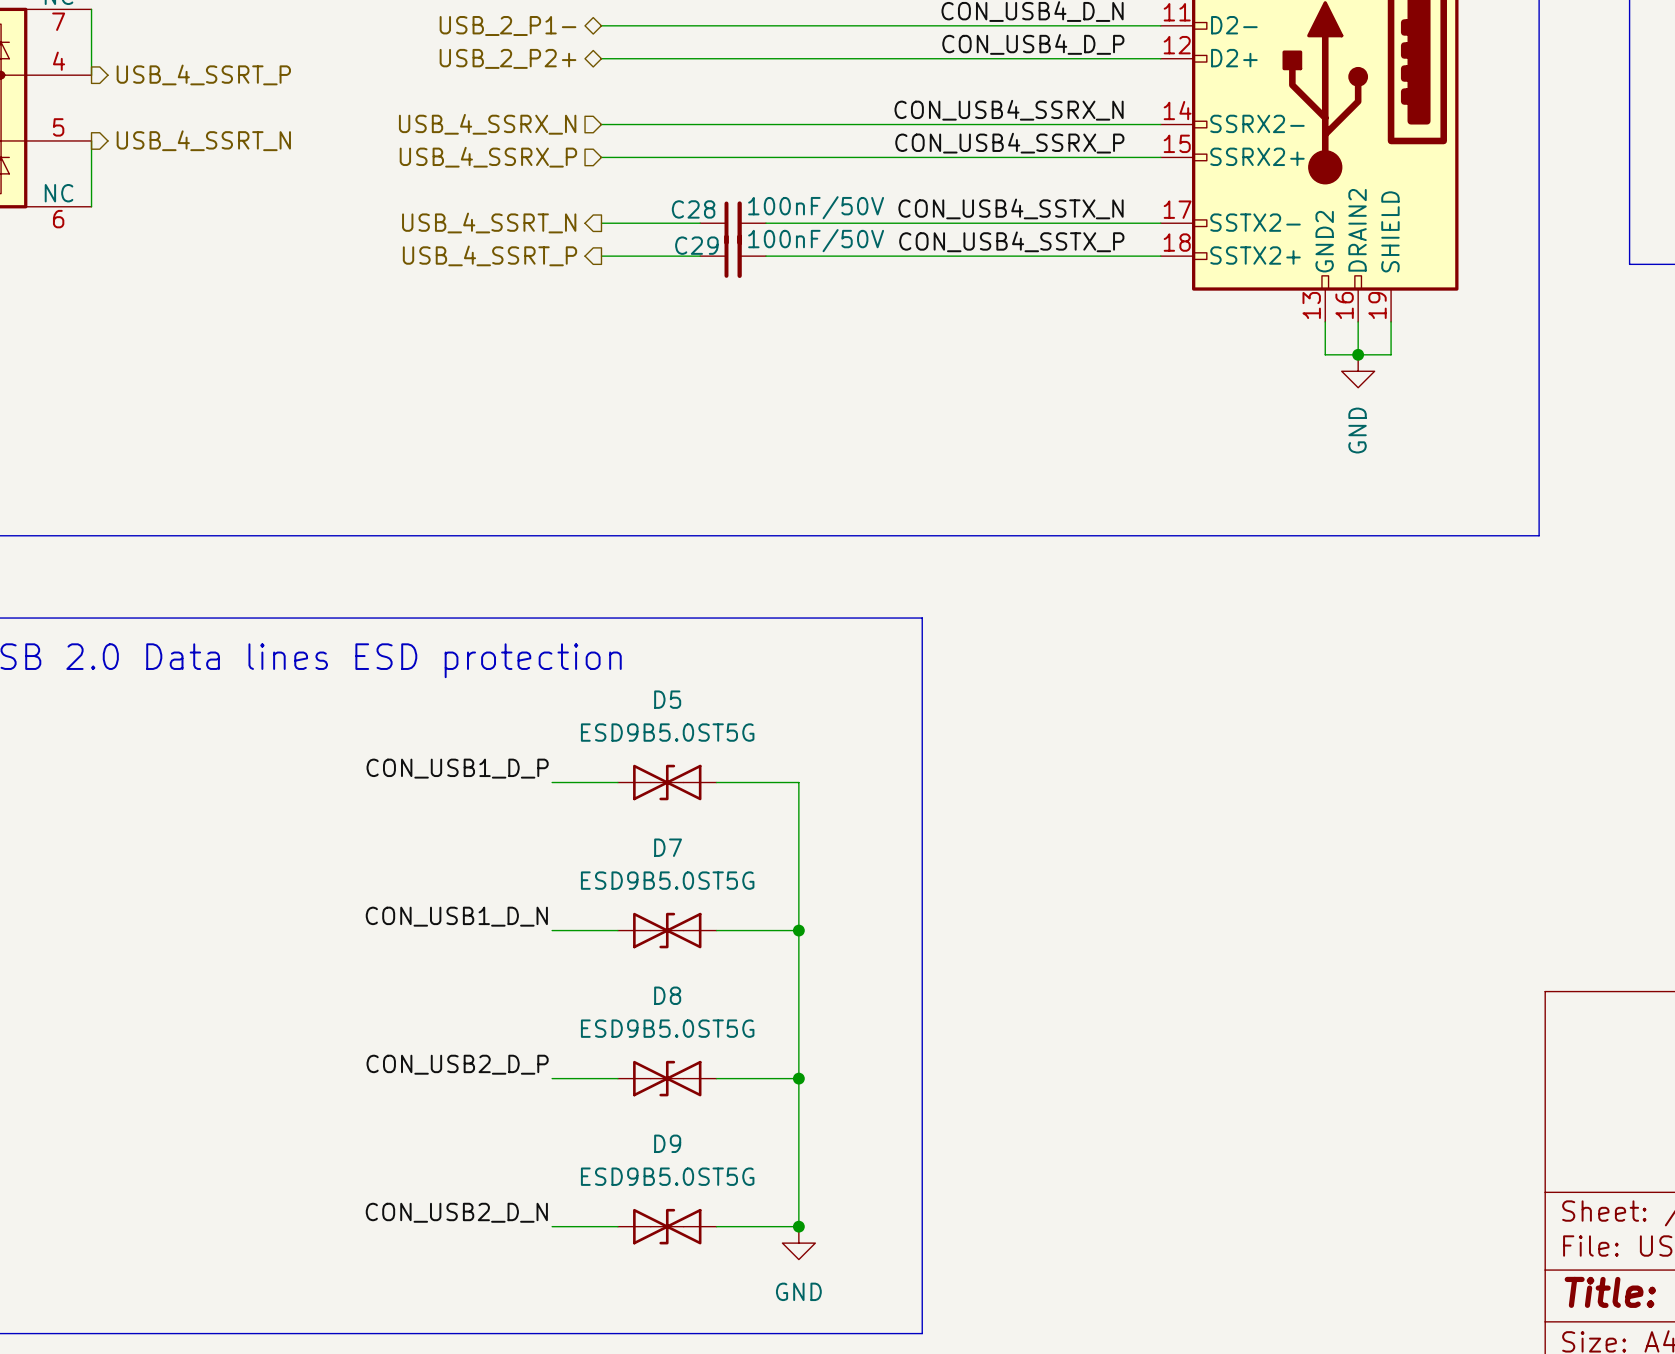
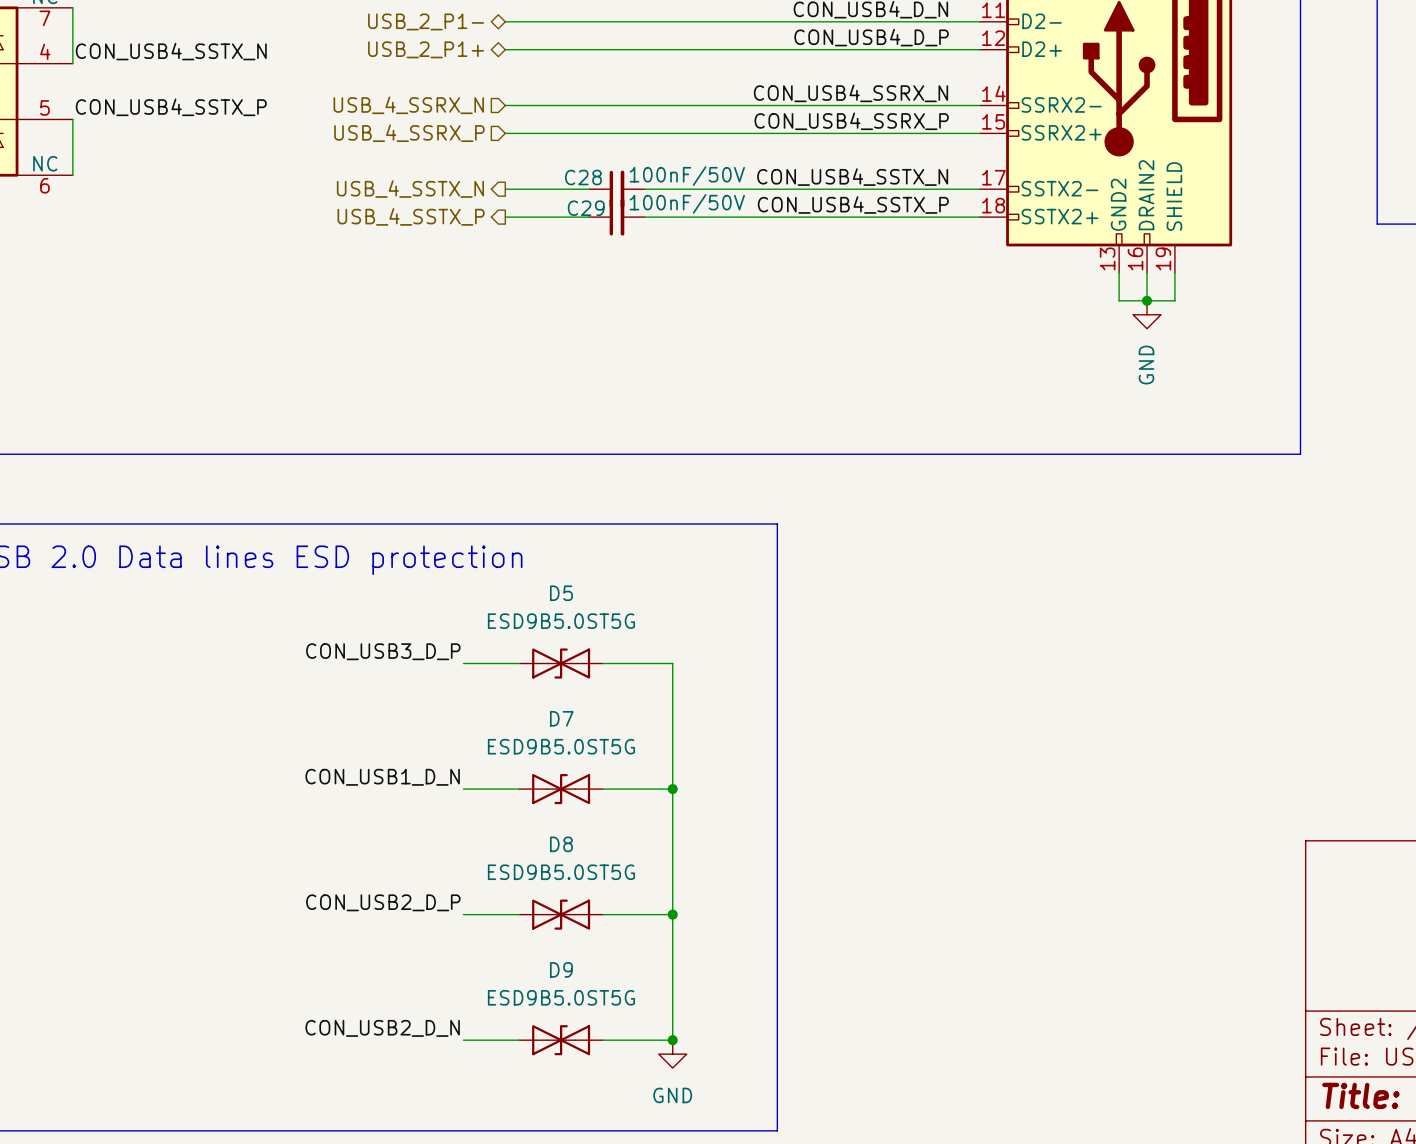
hierarchical label: USB_2_P2+ (508, 58) -> USB_2_P1+ (426, 49)
label: none -> CON_USB4_SSTX_N (171, 51)
hierarchical label: USB_4_SSRT_P (203, 74) -> none
label: none -> CON_USB4_SSTX_P (171, 107)
hierarchical label: USB_4_SSRT_N (203, 140) -> none
hierarchical label: USB_4_SSRT_N (489, 223) -> USB_4_SSTX_N (410, 189)
hierarchical label: USB_4_SSRT_P (489, 255) -> USB_4_SSTX_P (411, 216)
label: CON_USB1_D_P (457, 768) -> CON_USB3_D_P (383, 651)

